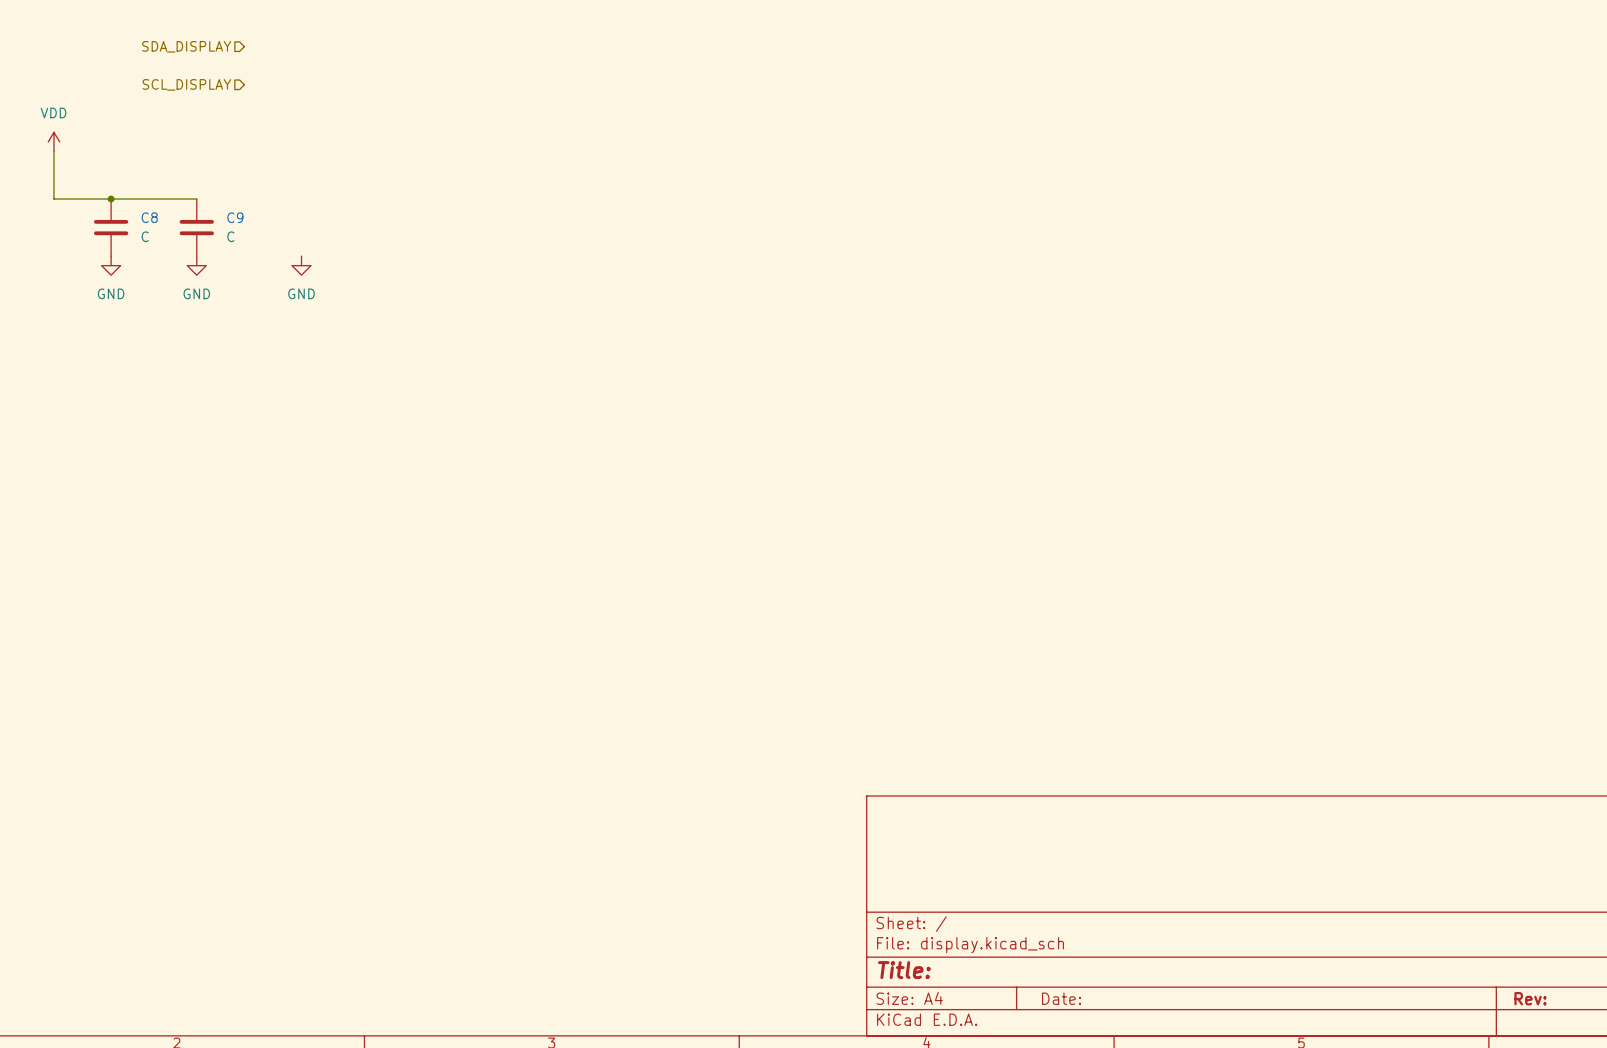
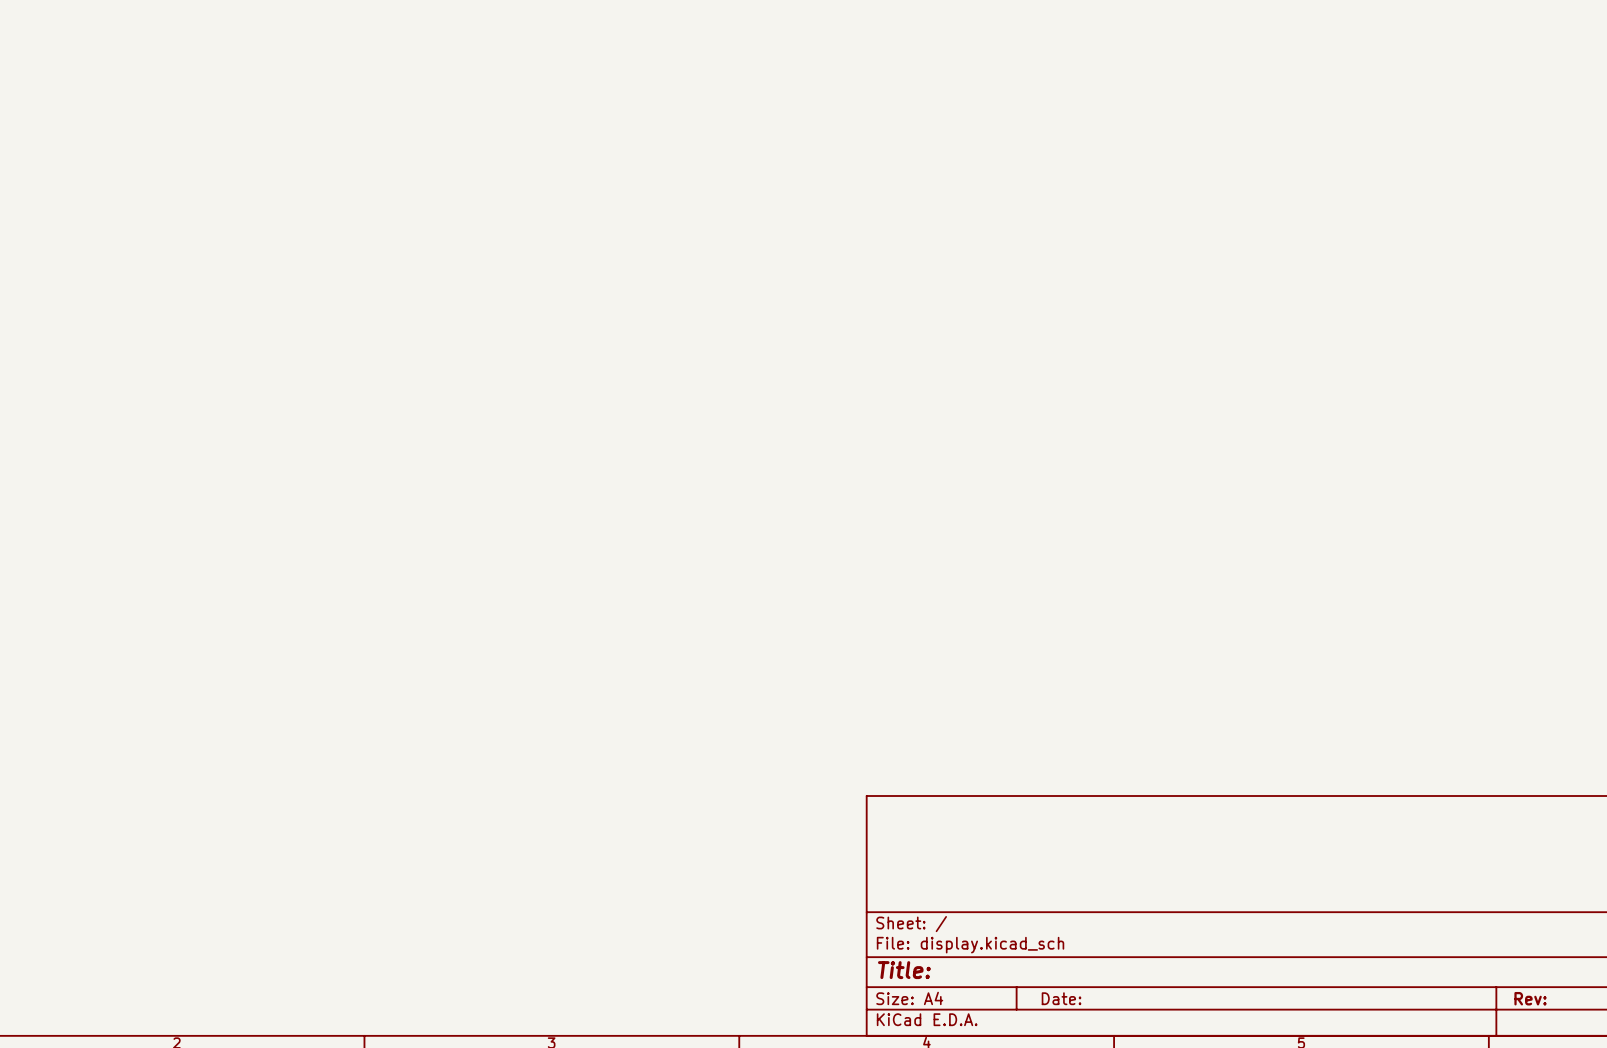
hierarchical label: SDA_DISPLAY (186, 46) -> none
hierarchical label: SCL_DISPLAY (186, 84) -> none
power symbol: VDD (53, 141) -> none
wire: (53, 151) (53, 199) (196, 199) -> none
junction: (111, 199) -> none
C8: C (111, 227) -> none
C9: C (196, 227) -> none
power symbol: GND (111, 265) -> none
power symbol: GND (196, 265) -> none
power symbol: GND (301, 265) -> none

